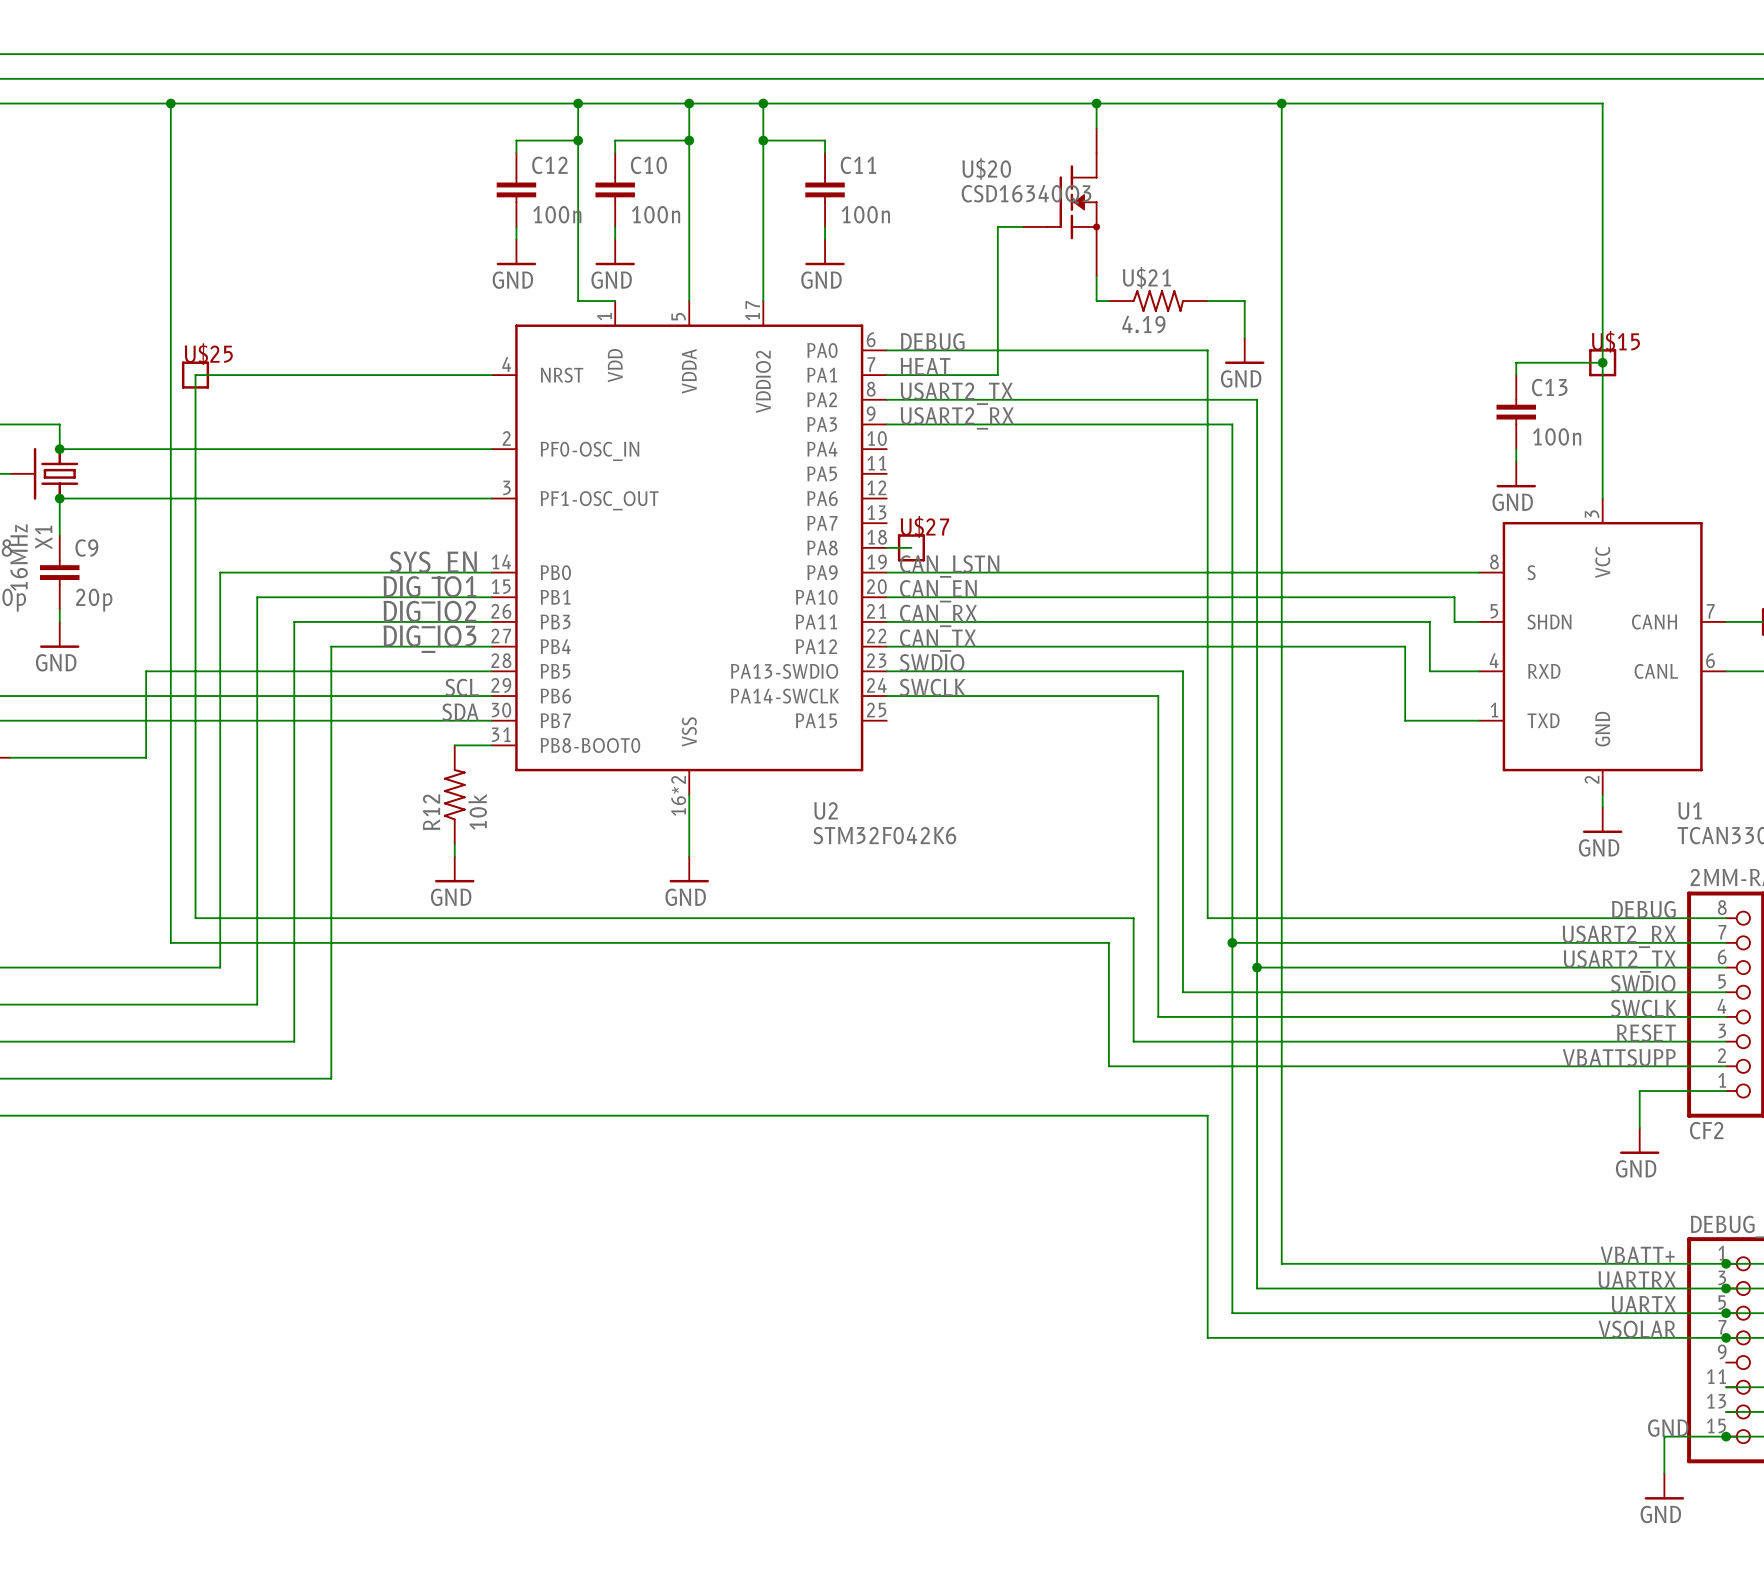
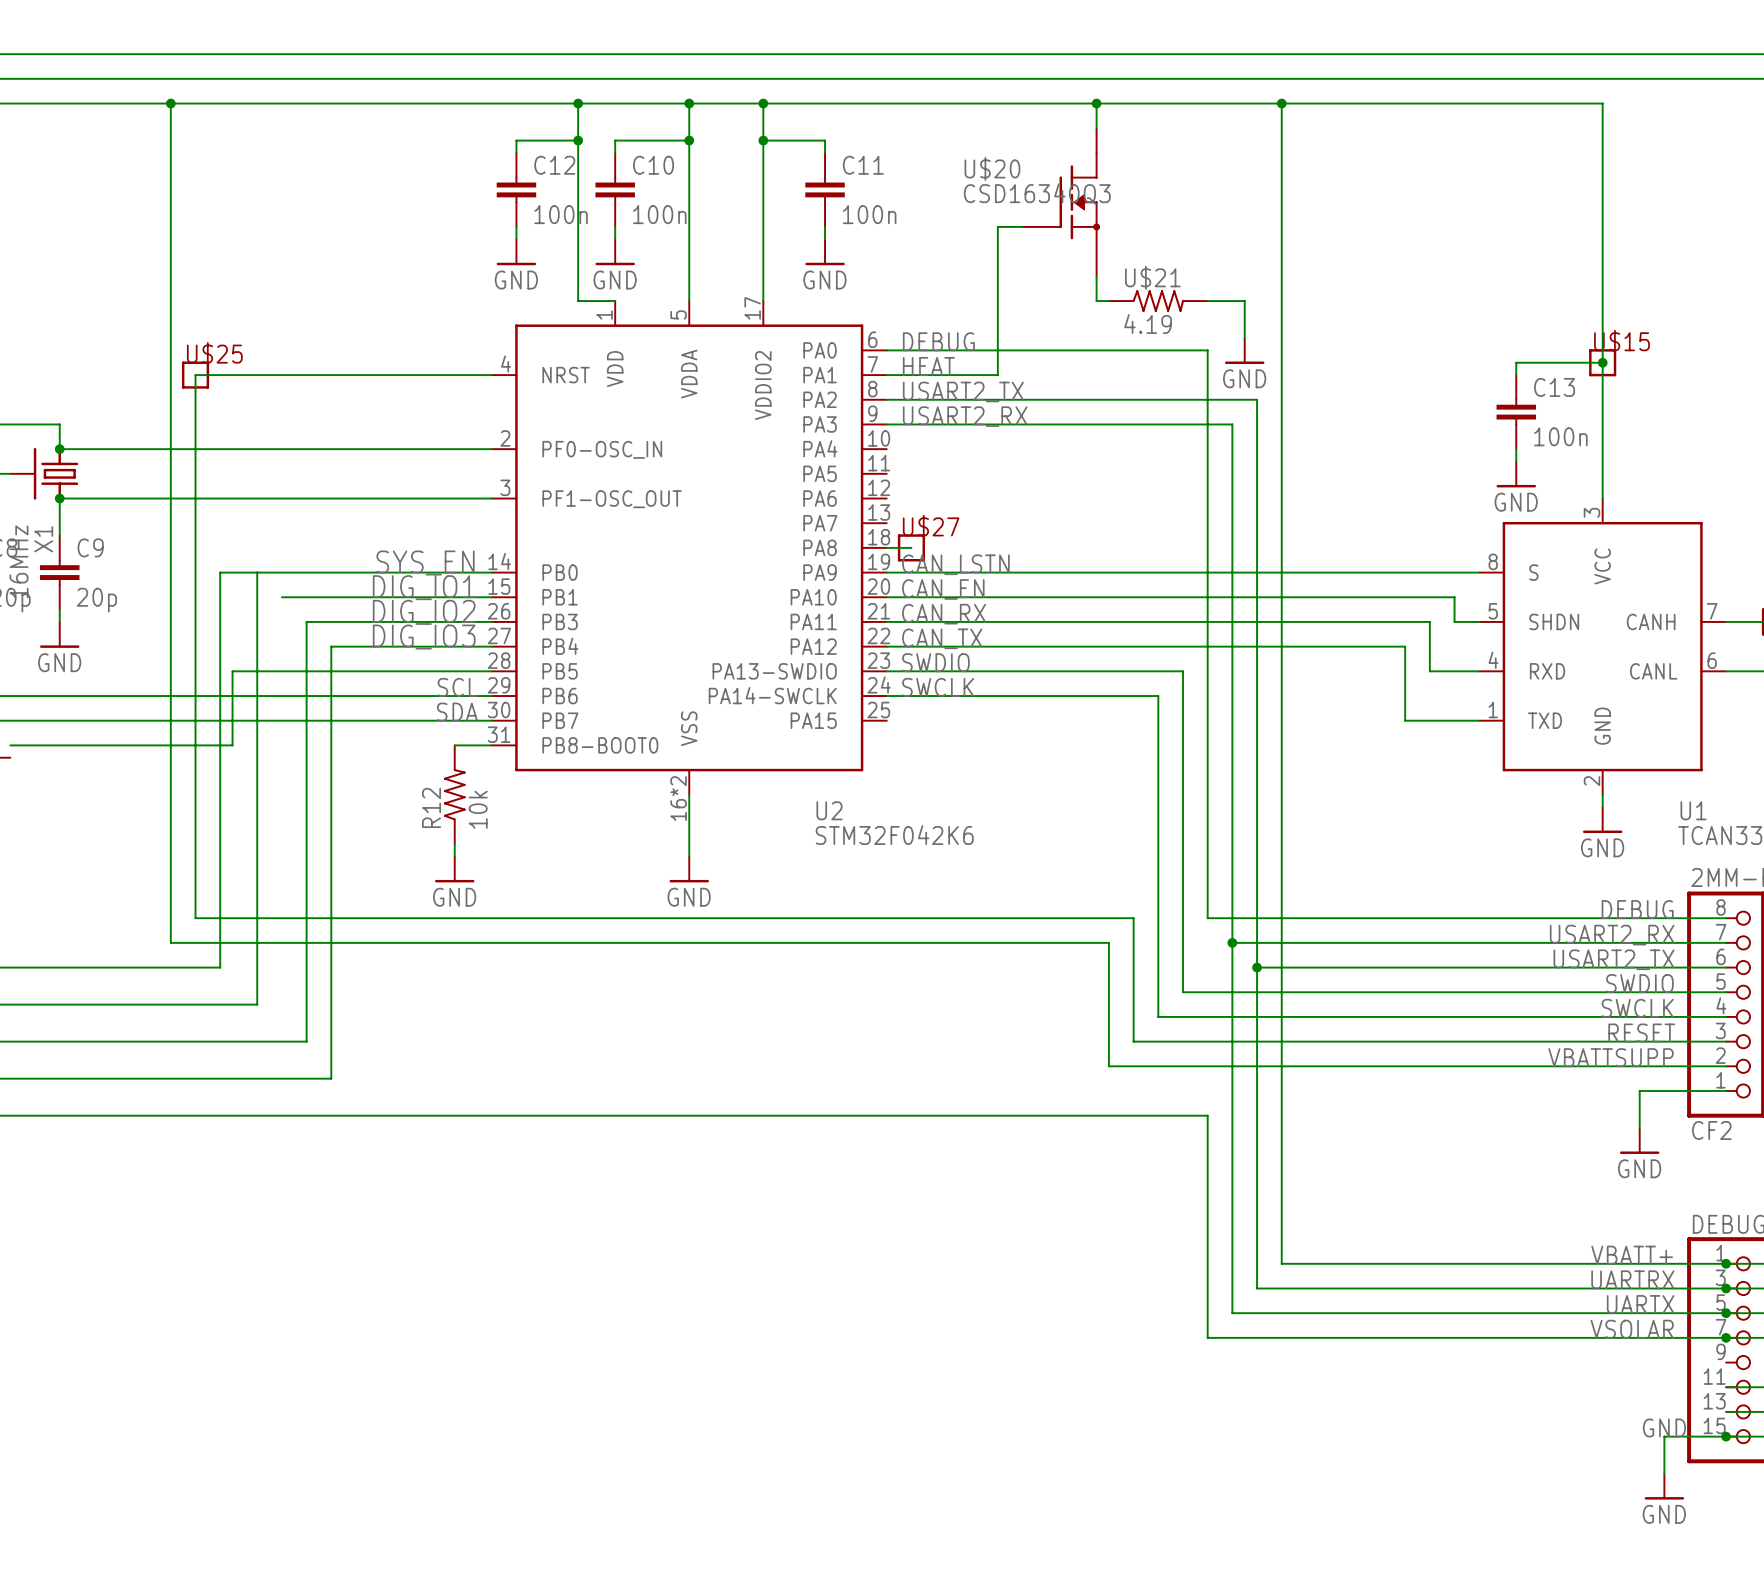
wire: (257, 597) (281, 597) -> (257, 597) (257, 572)
wire: (306, 621) (294, 621) (294, 1041) -> (306, 621) (306, 1041) (294, 1041)
wire: (232, 671) (146, 671) (146, 757) (10, 757) -> (232, 671) (232, 745) (10, 745)

